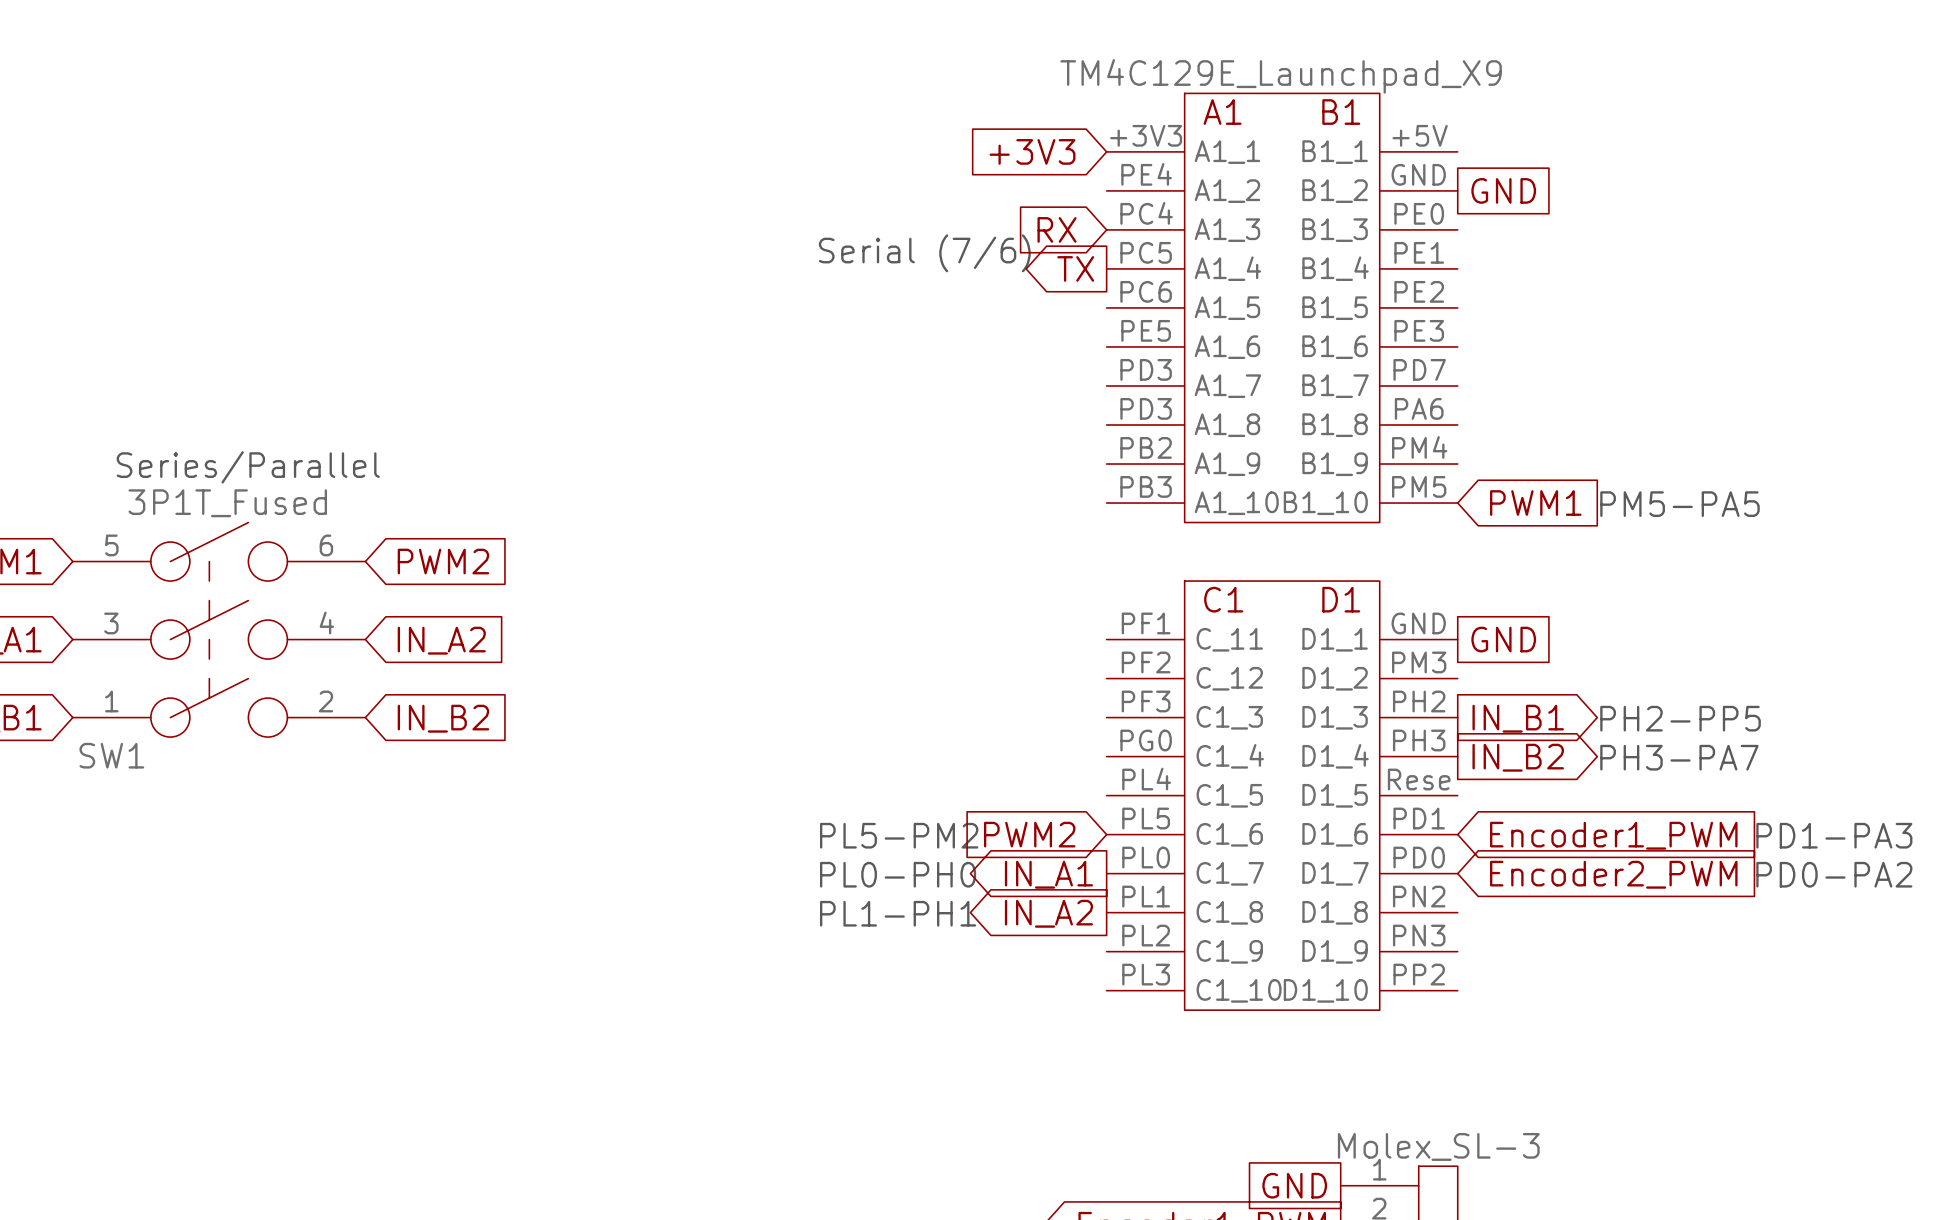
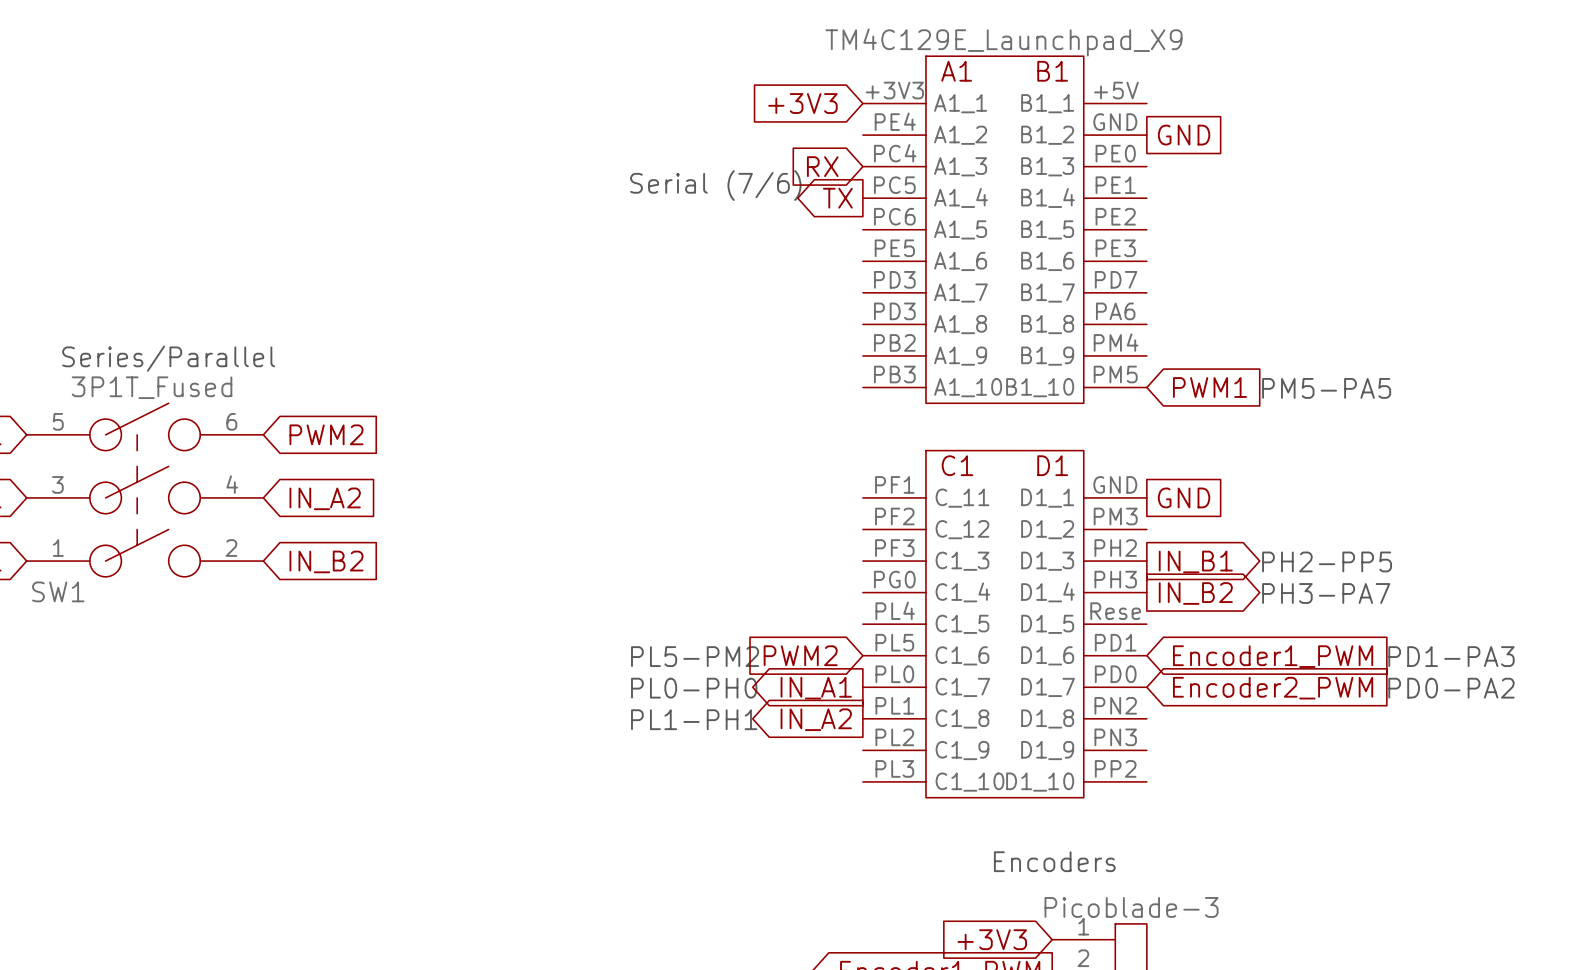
text: none -> Encoders (1054, 861)
part value: Molex_SL-3 (1438, 1146) -> Picoblade-3 (1131, 907)
global label shape: passive (1294, 1185) -> input (992, 939)
global label: GND (1294, 1185) -> +3V3 (992, 939)

